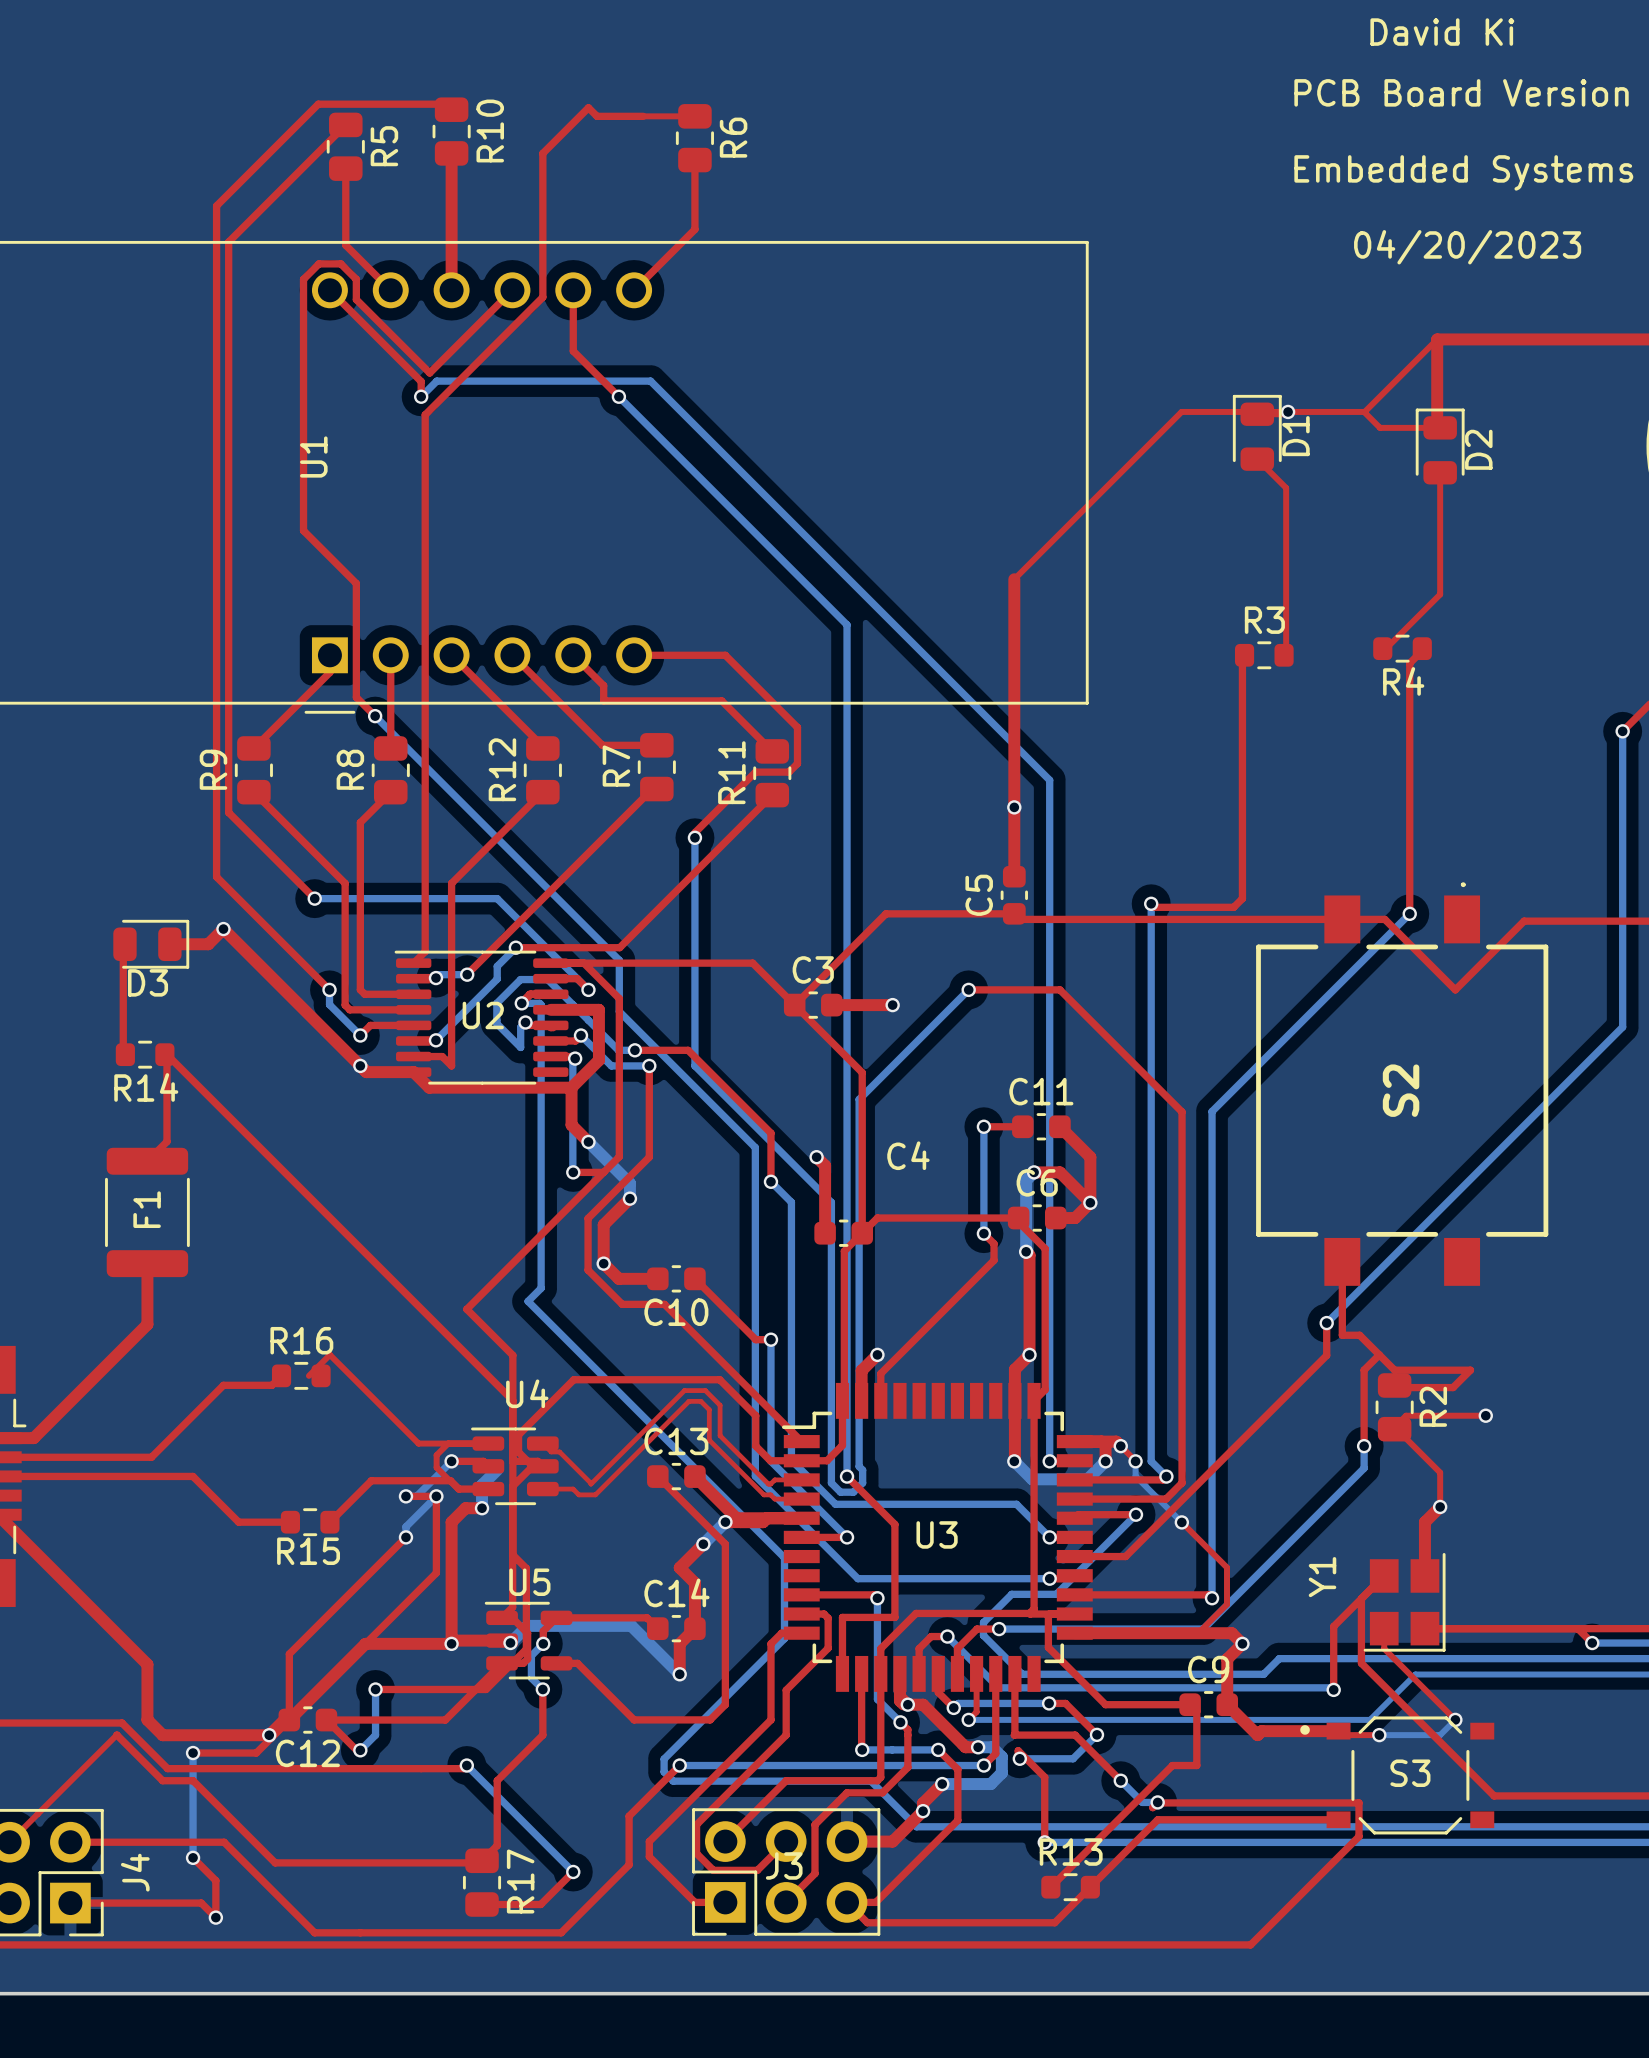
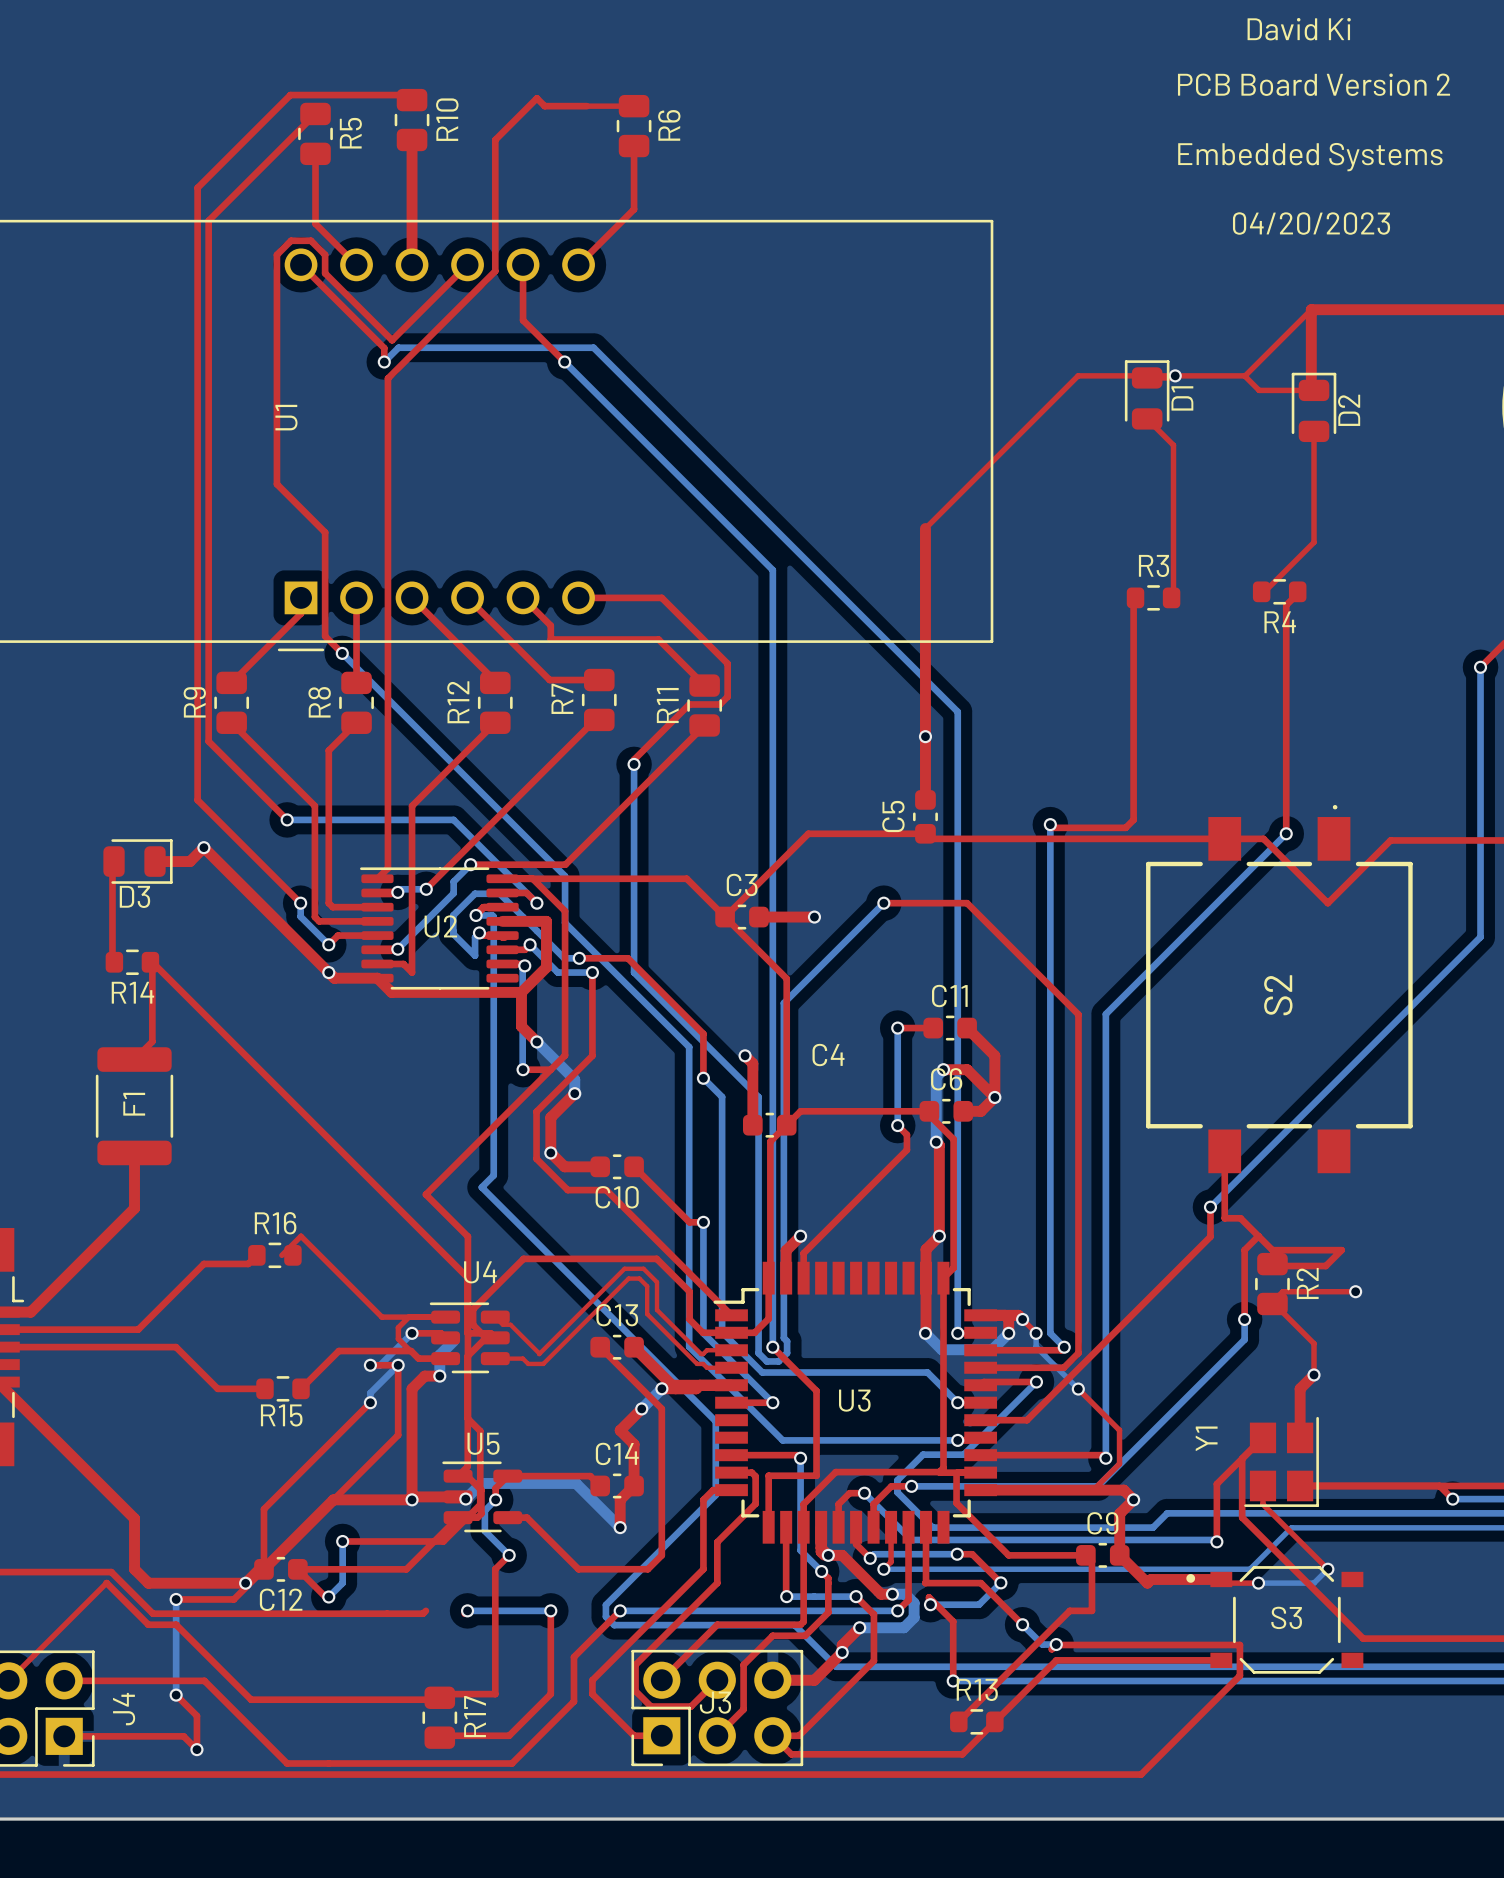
top track: (542, 1689) (542, 1719) -> (509, 1555) (495, 1569)
bottom track: none -> (495, 1541) (509, 1555)
via position: (542, 1689) -> (509, 1555)
top track: (542, 1735) (512, 1765) -> none
bottom track: (466, 1765) (573, 1871) -> none
via: (466, 1765) -> none
bottom track: none -> (467, 1610) (550, 1610)
via: none -> (467, 1610)
top track: none -> (550, 1610) (550, 1694) (509, 1735) (441, 1735)
via: none -> (550, 1610)
top track: (509, 1768) (497, 1780) (497, 1845) (486, 1856) -> (495, 1583) (495, 1694) (443, 1694)
top track: (573, 1871) (540, 1904) (482, 1904) -> none
via: (573, 1871) -> none

